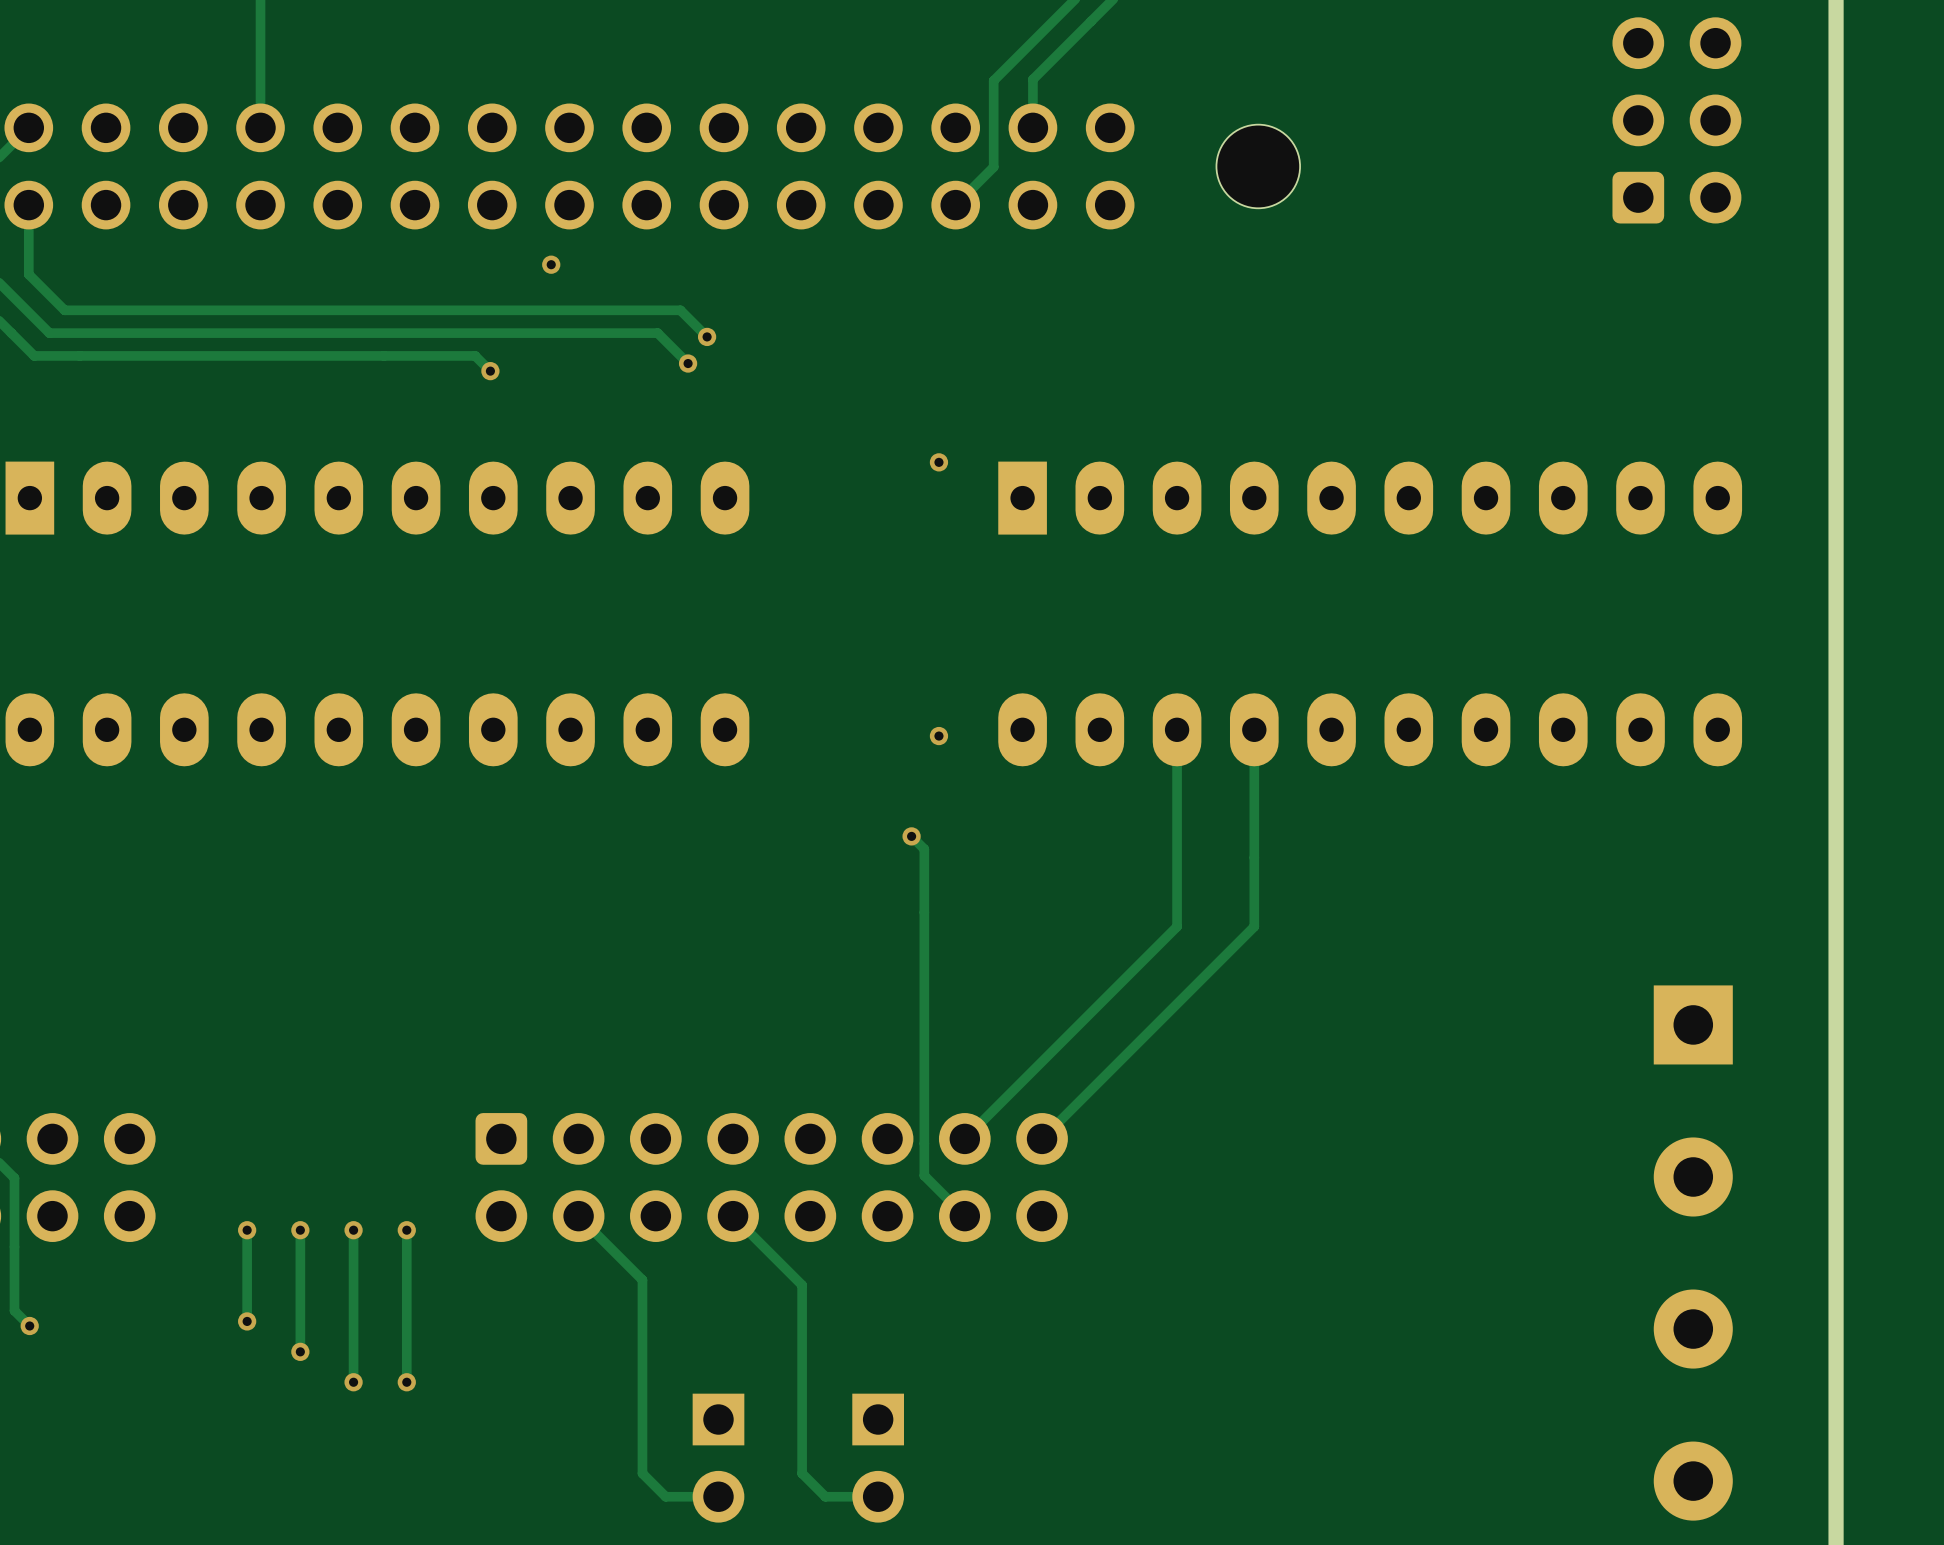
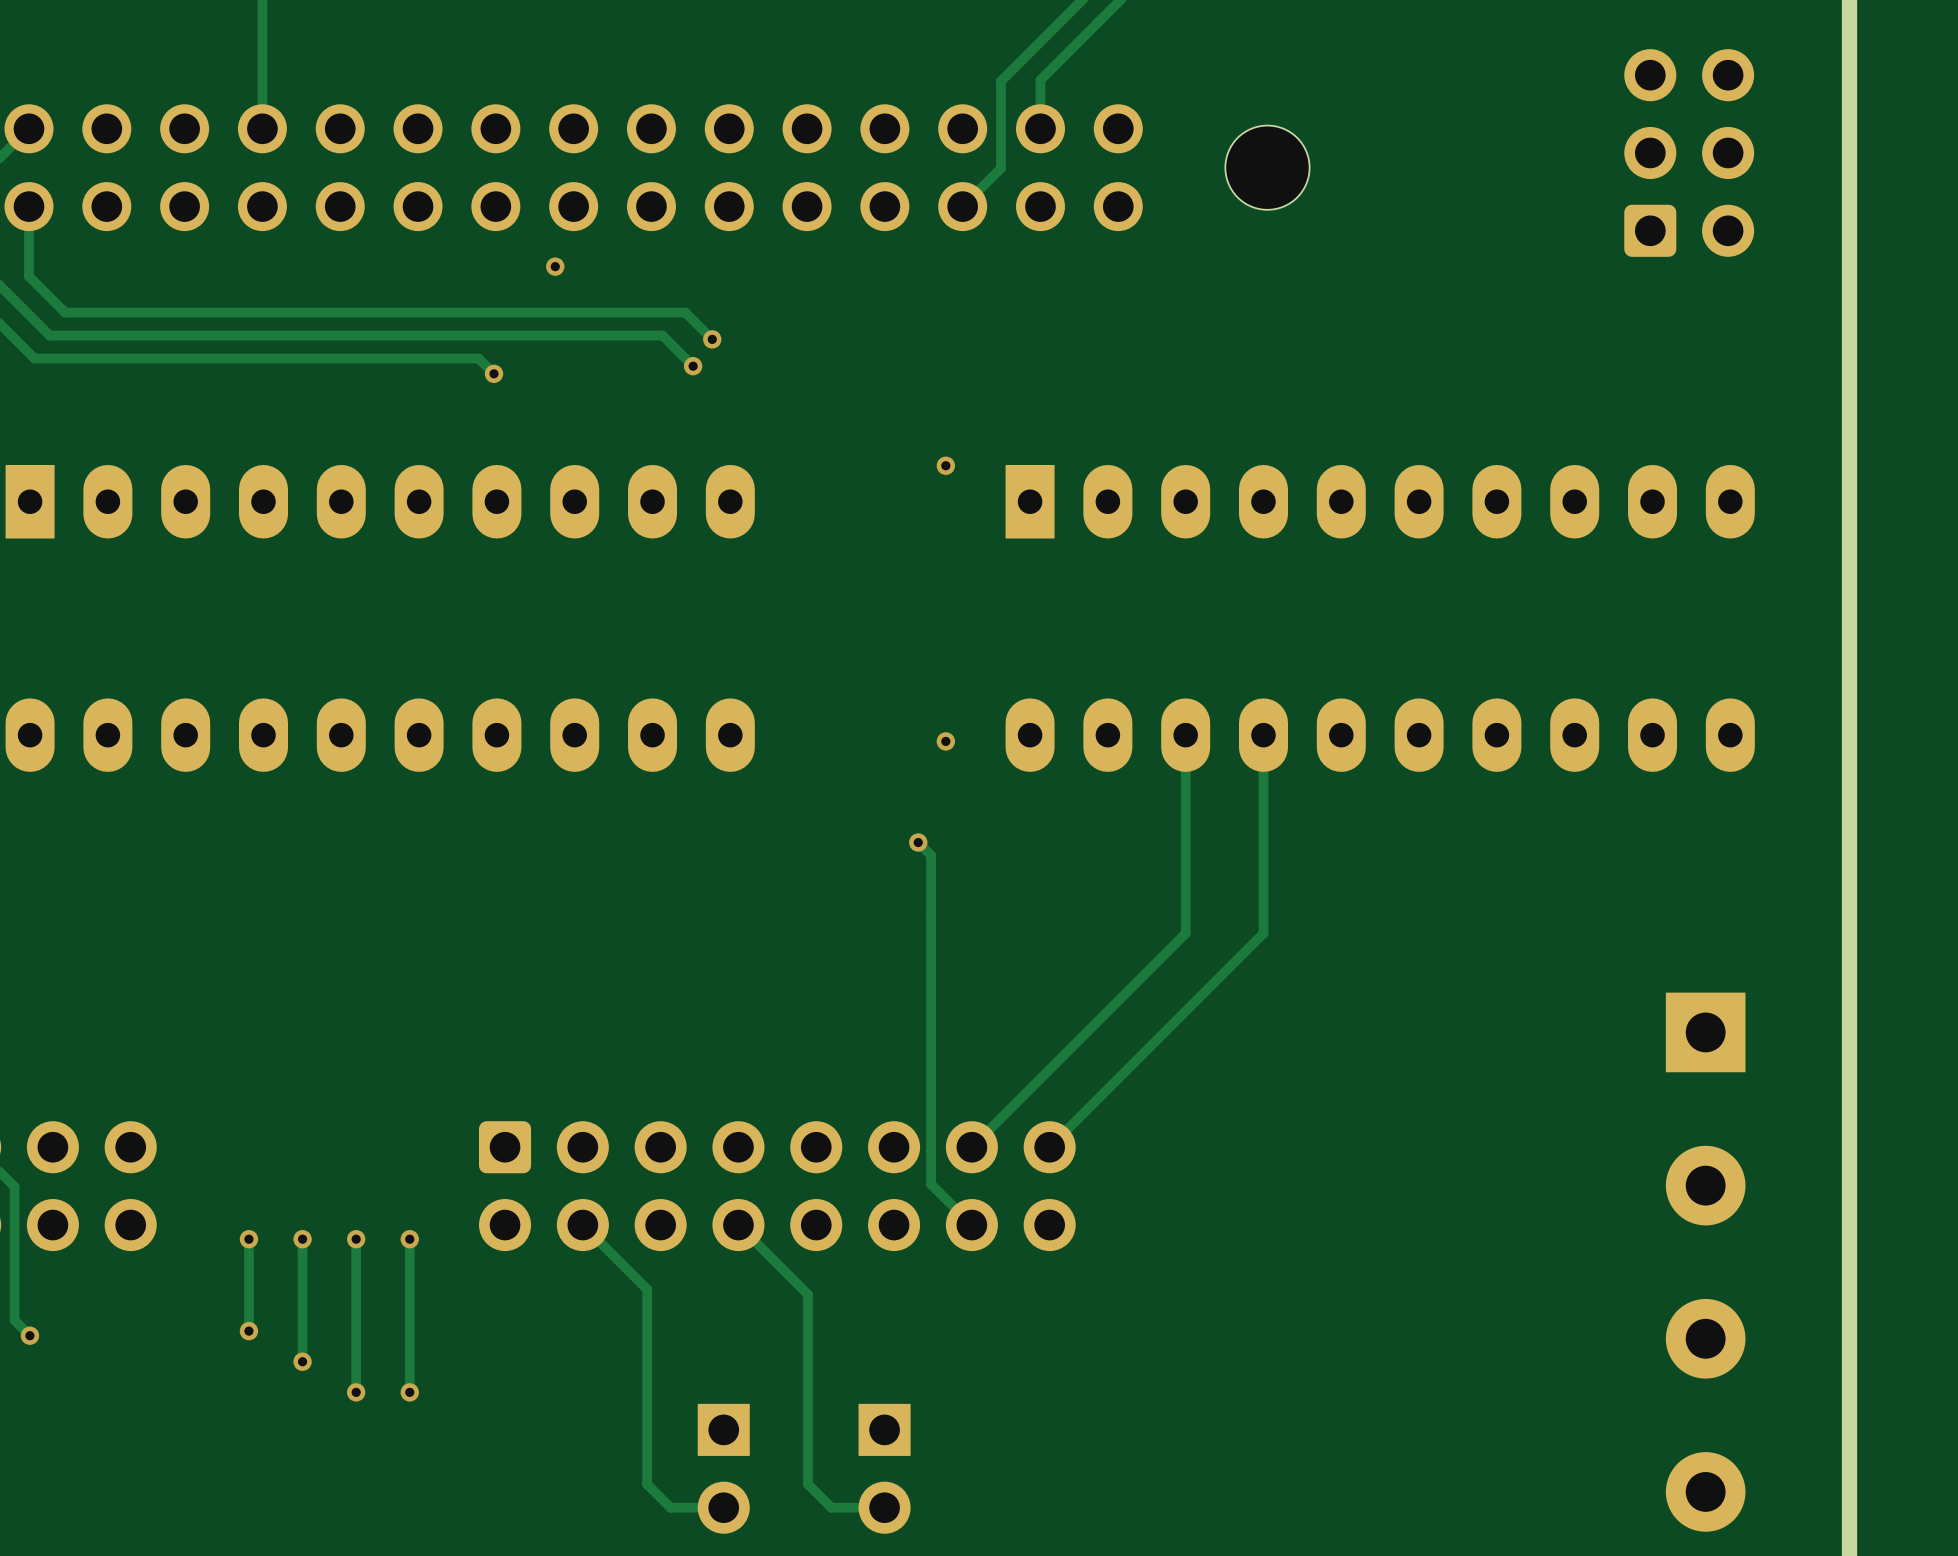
part position: (1676, 120) -> (1689, 152)

